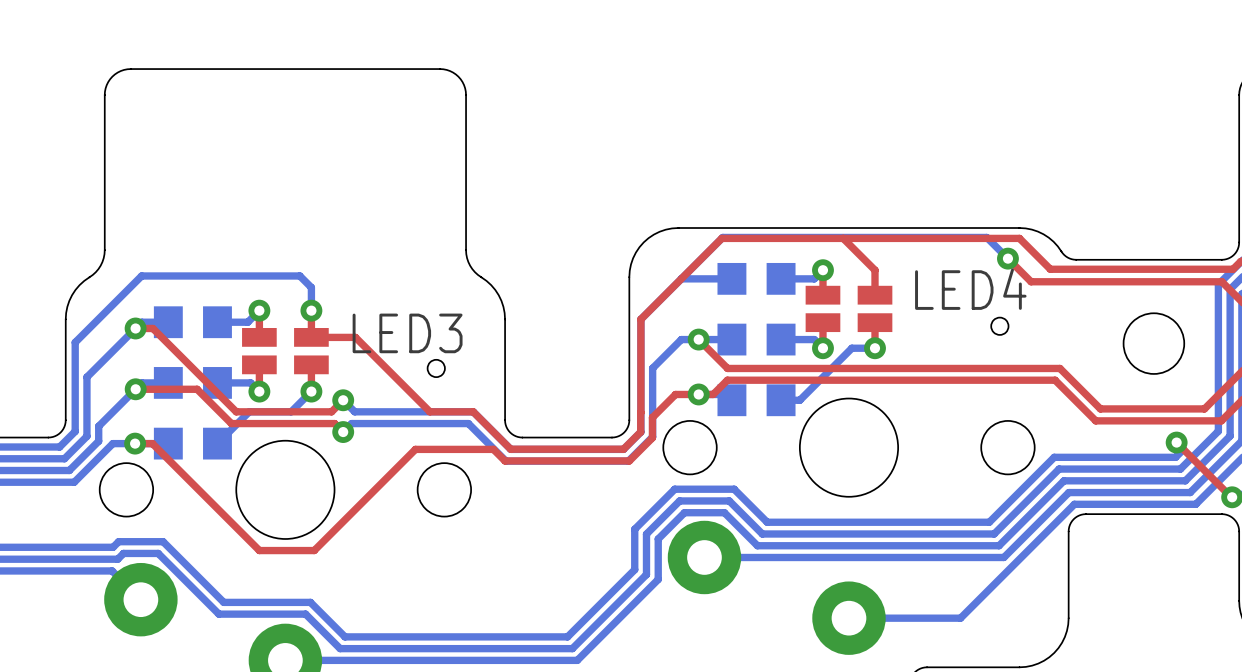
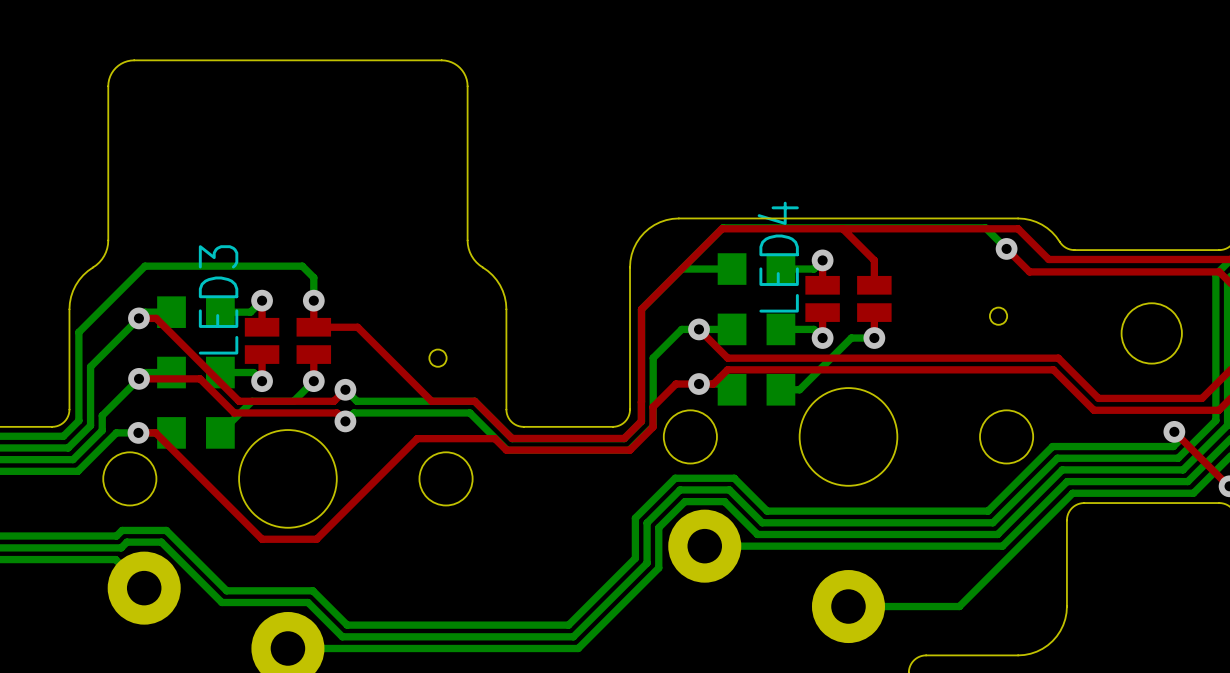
LED4 name rotation: 0° (970, 289) -> 90° counterclockwise (778, 257)
LED4 name position: LED4 (970, 289) -> LED4 (778, 257)
LED3 name rotation: 0° (407, 333) -> 90° counterclockwise (218, 299)
LED3 name position: LED3 (407, 333) -> LED3 (218, 299)

